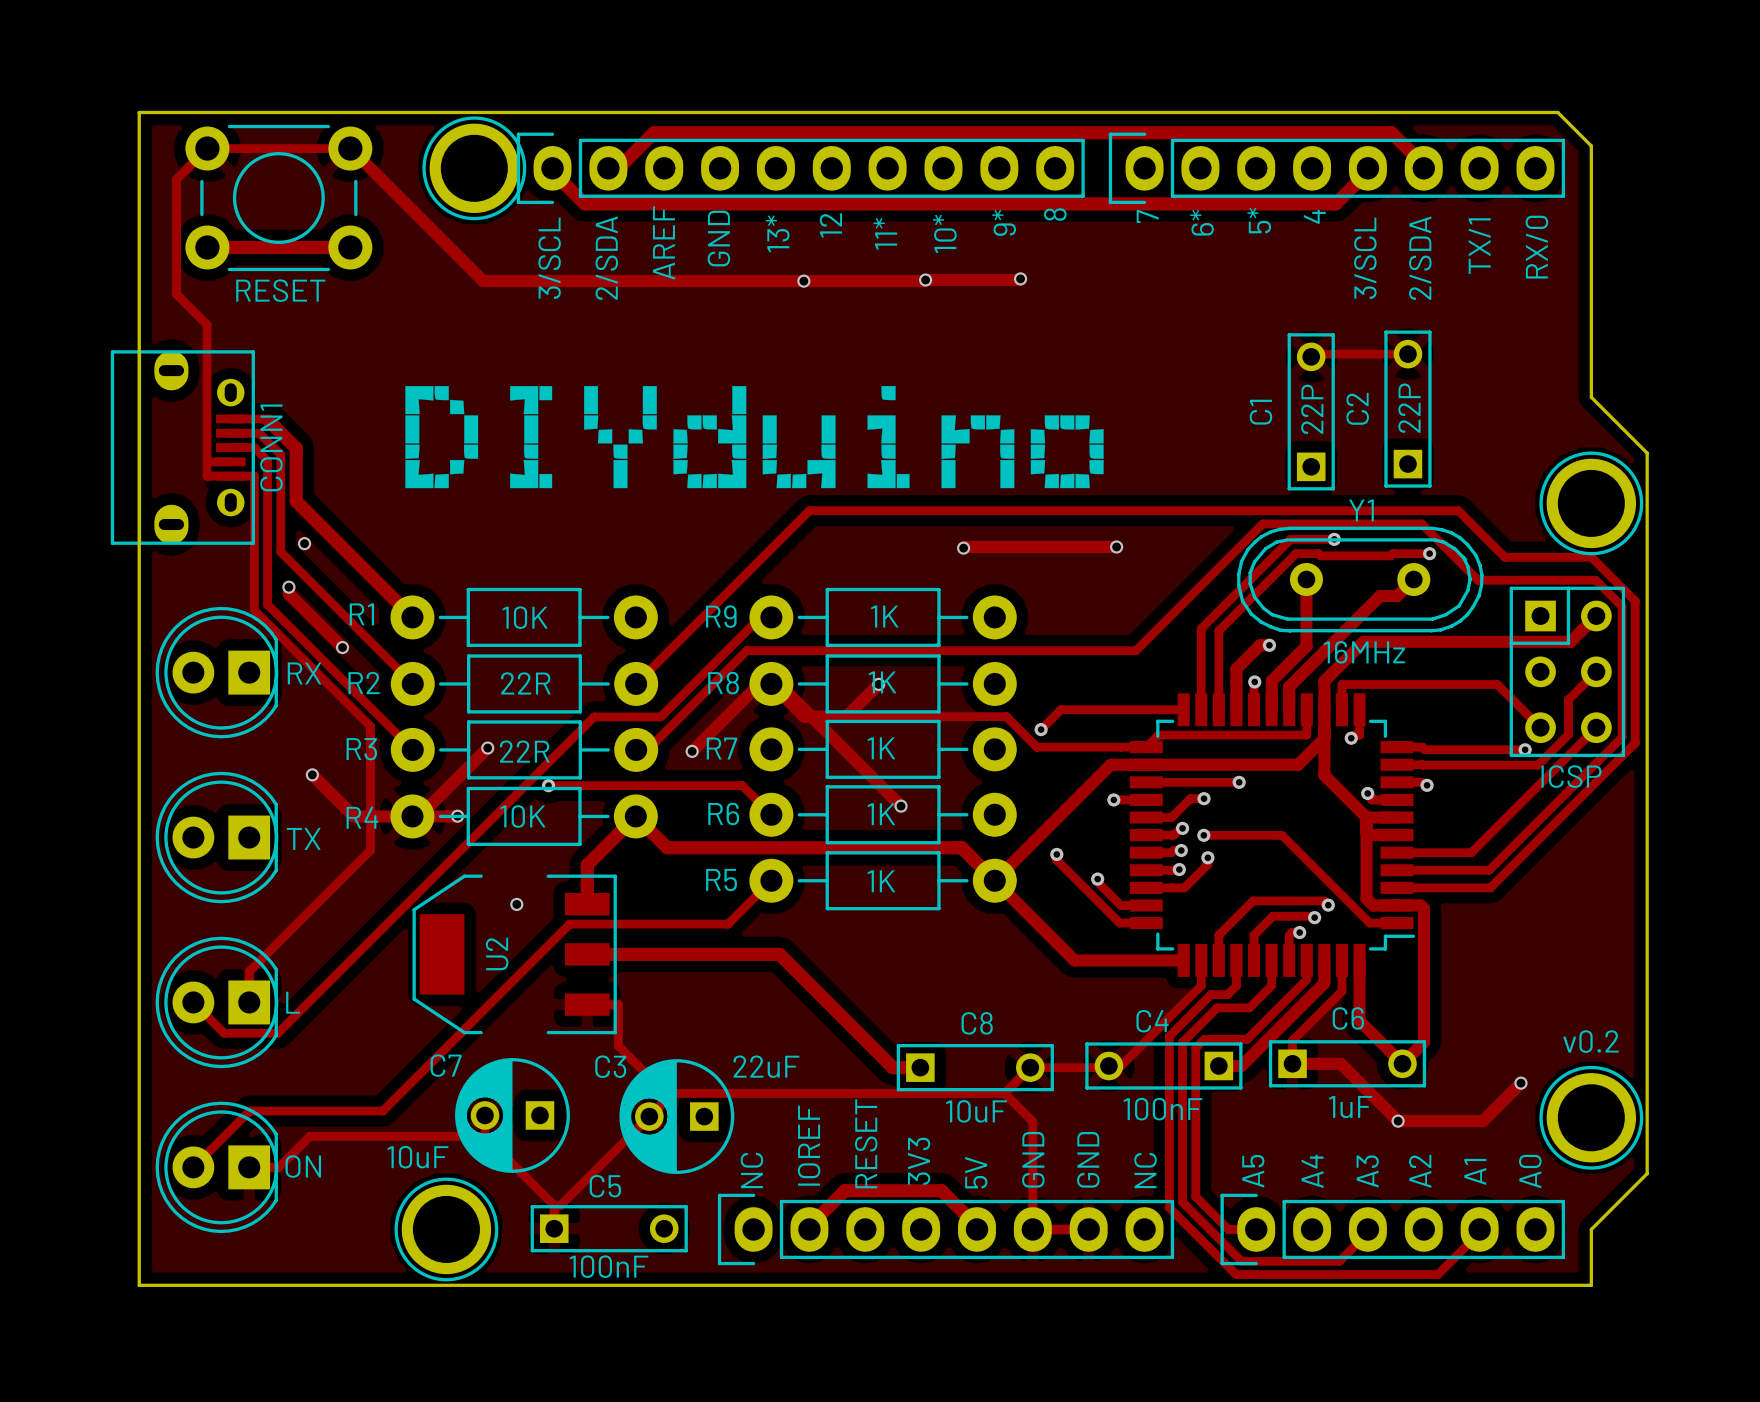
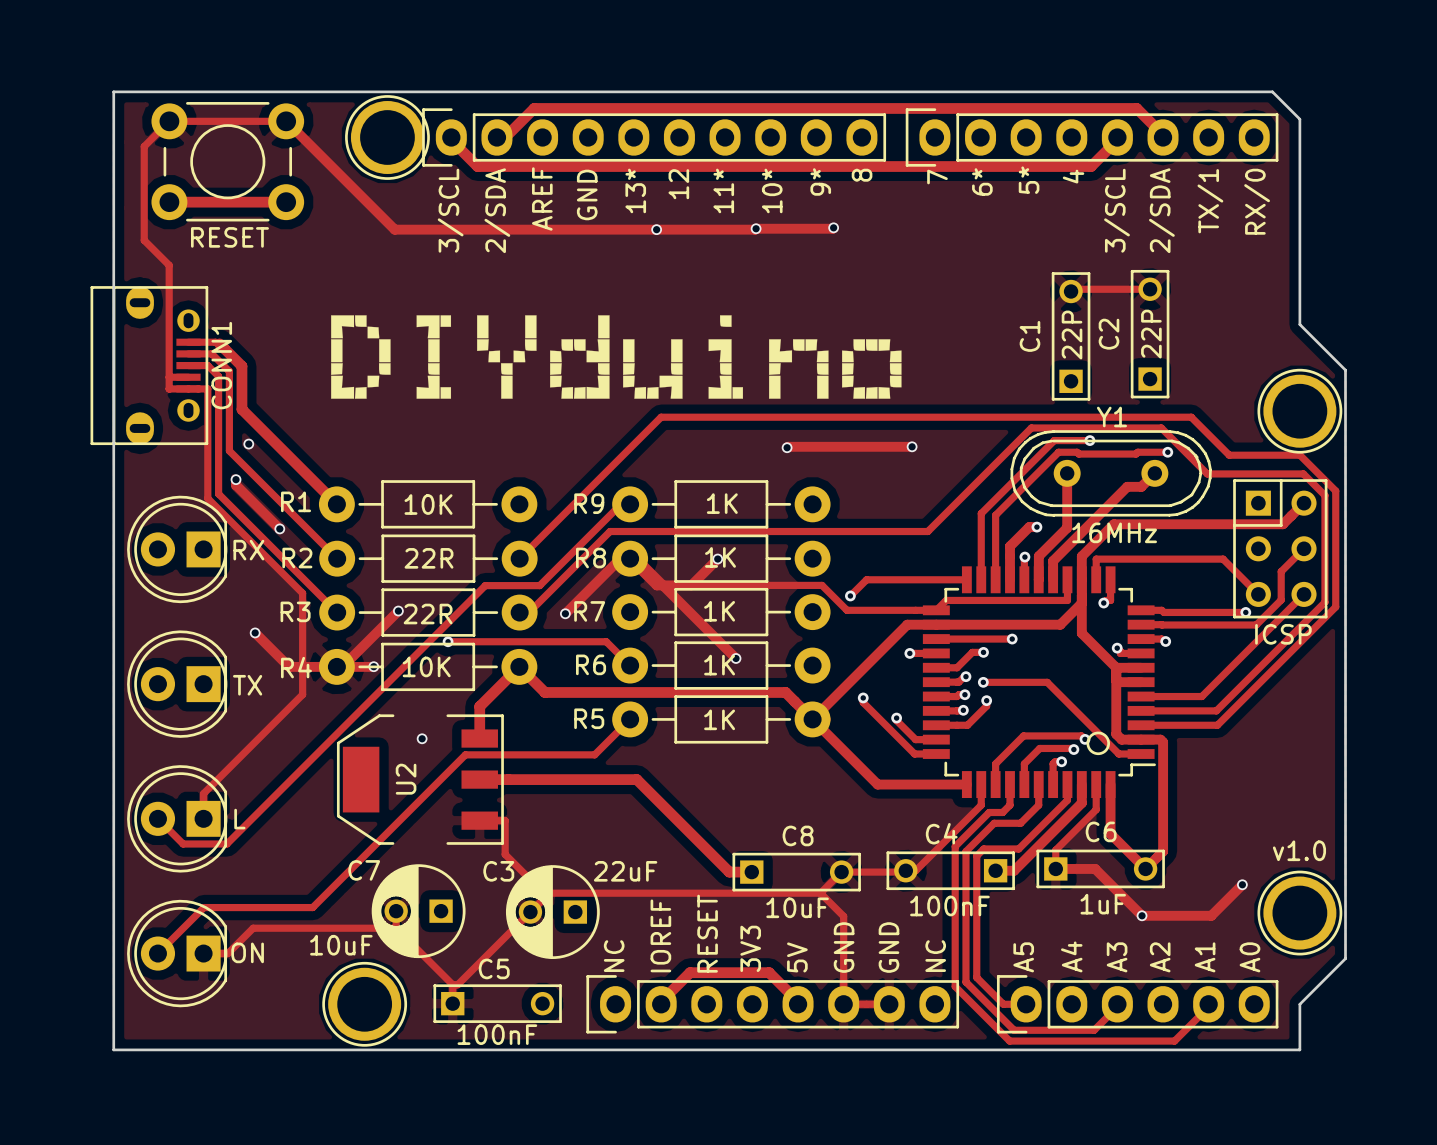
drawing: none -> [1086, 731, 1110, 756]
text: v0.2 (1590, 1041) -> v1.0 (1299, 850)

